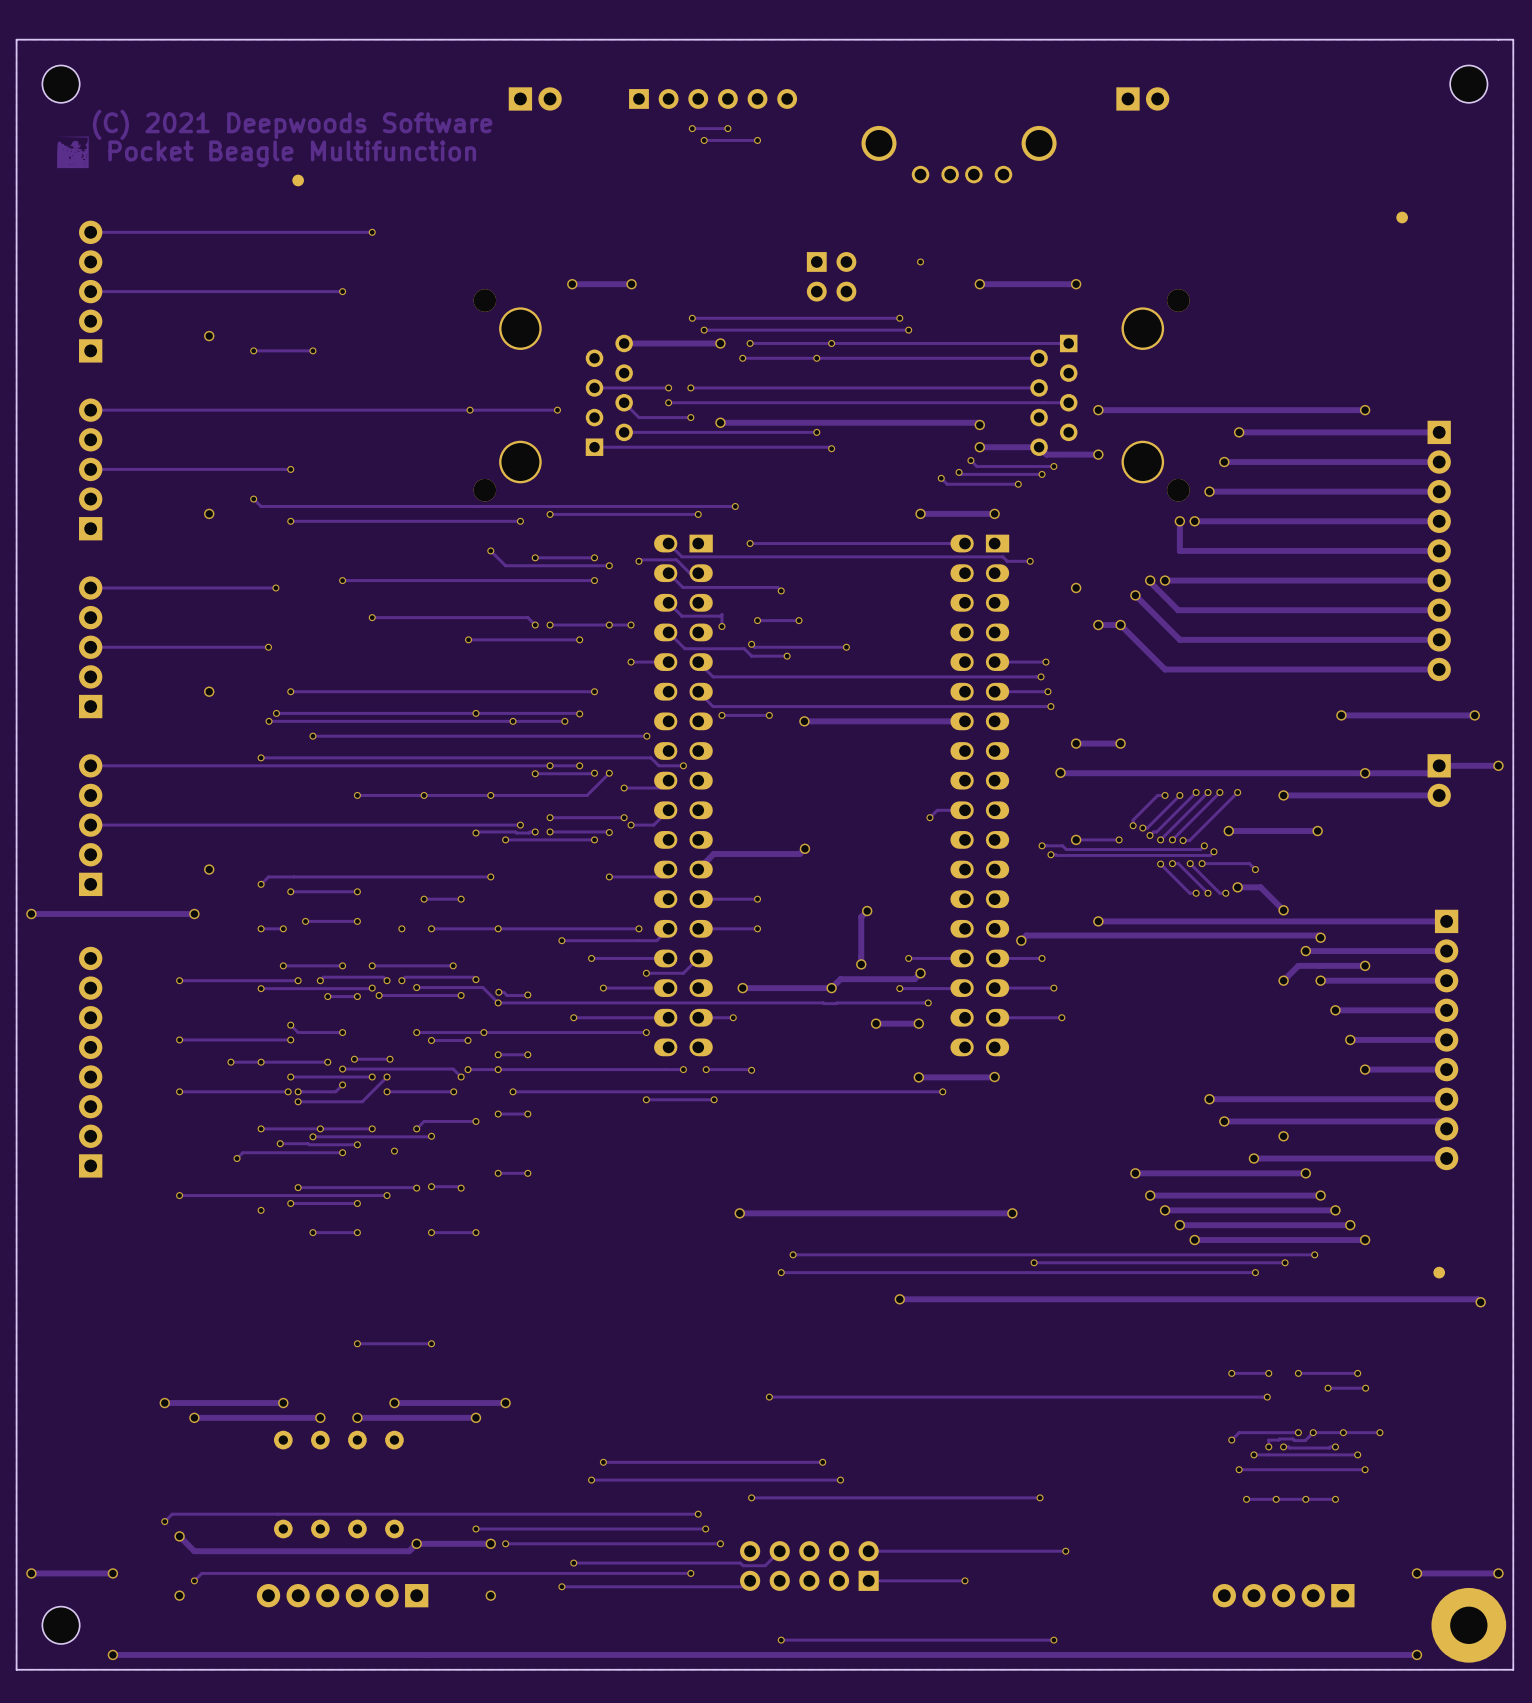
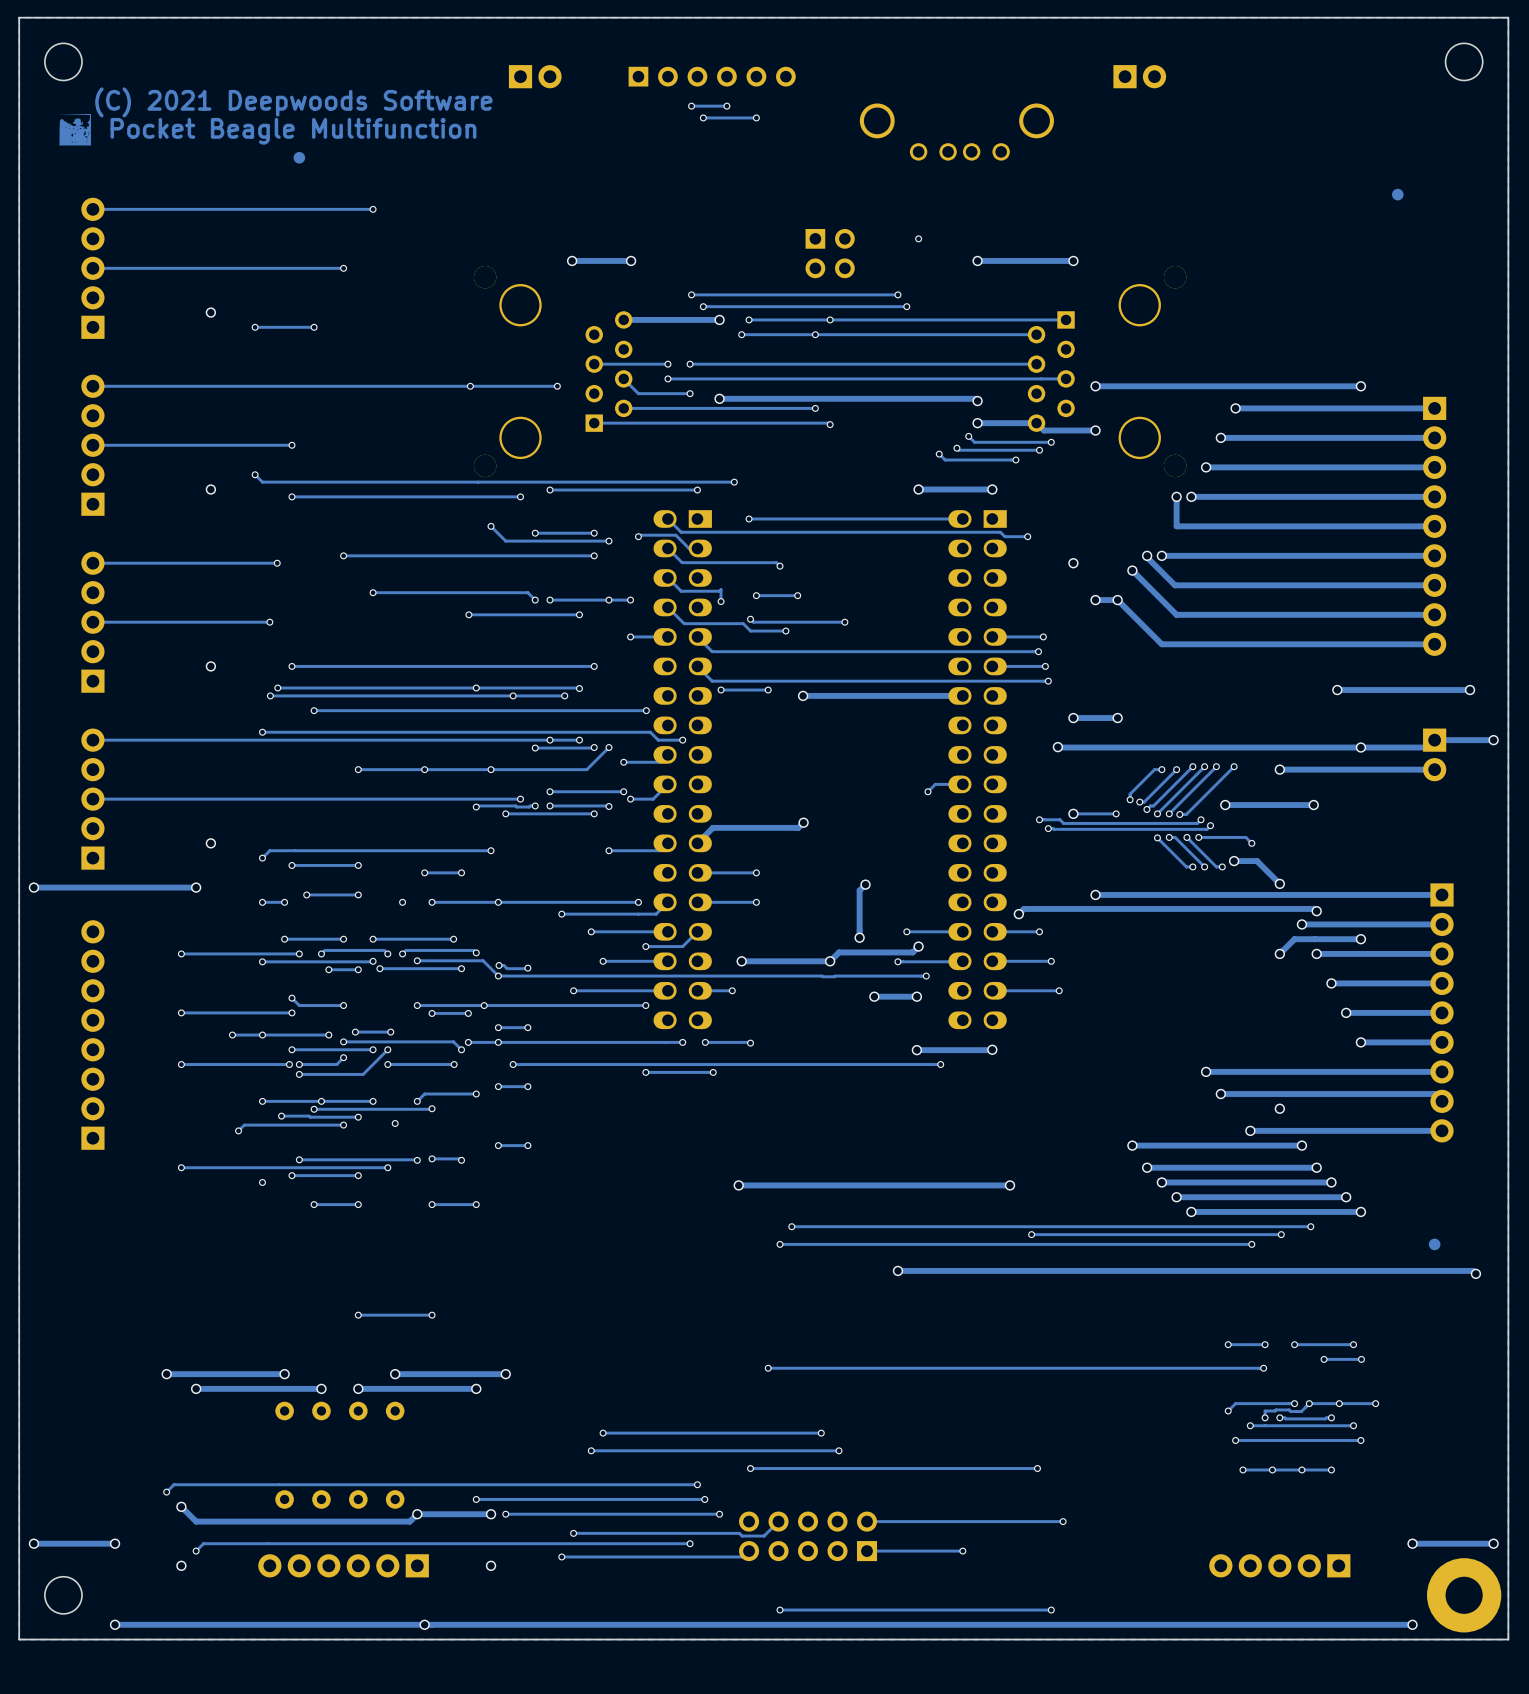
via: none -> (424, 1624)

